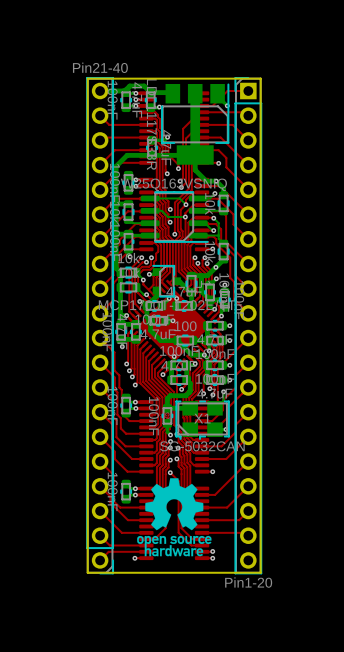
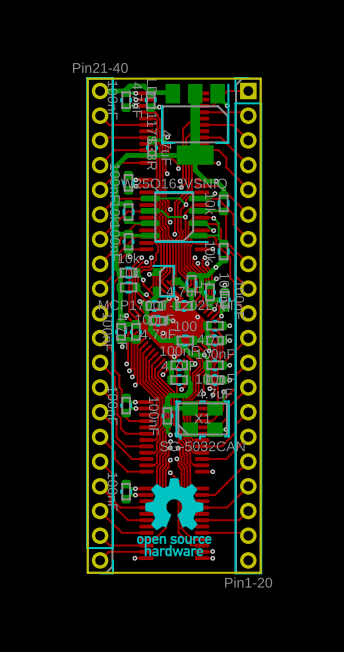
via: none -> (197, 317)
via: none -> (163, 333)

